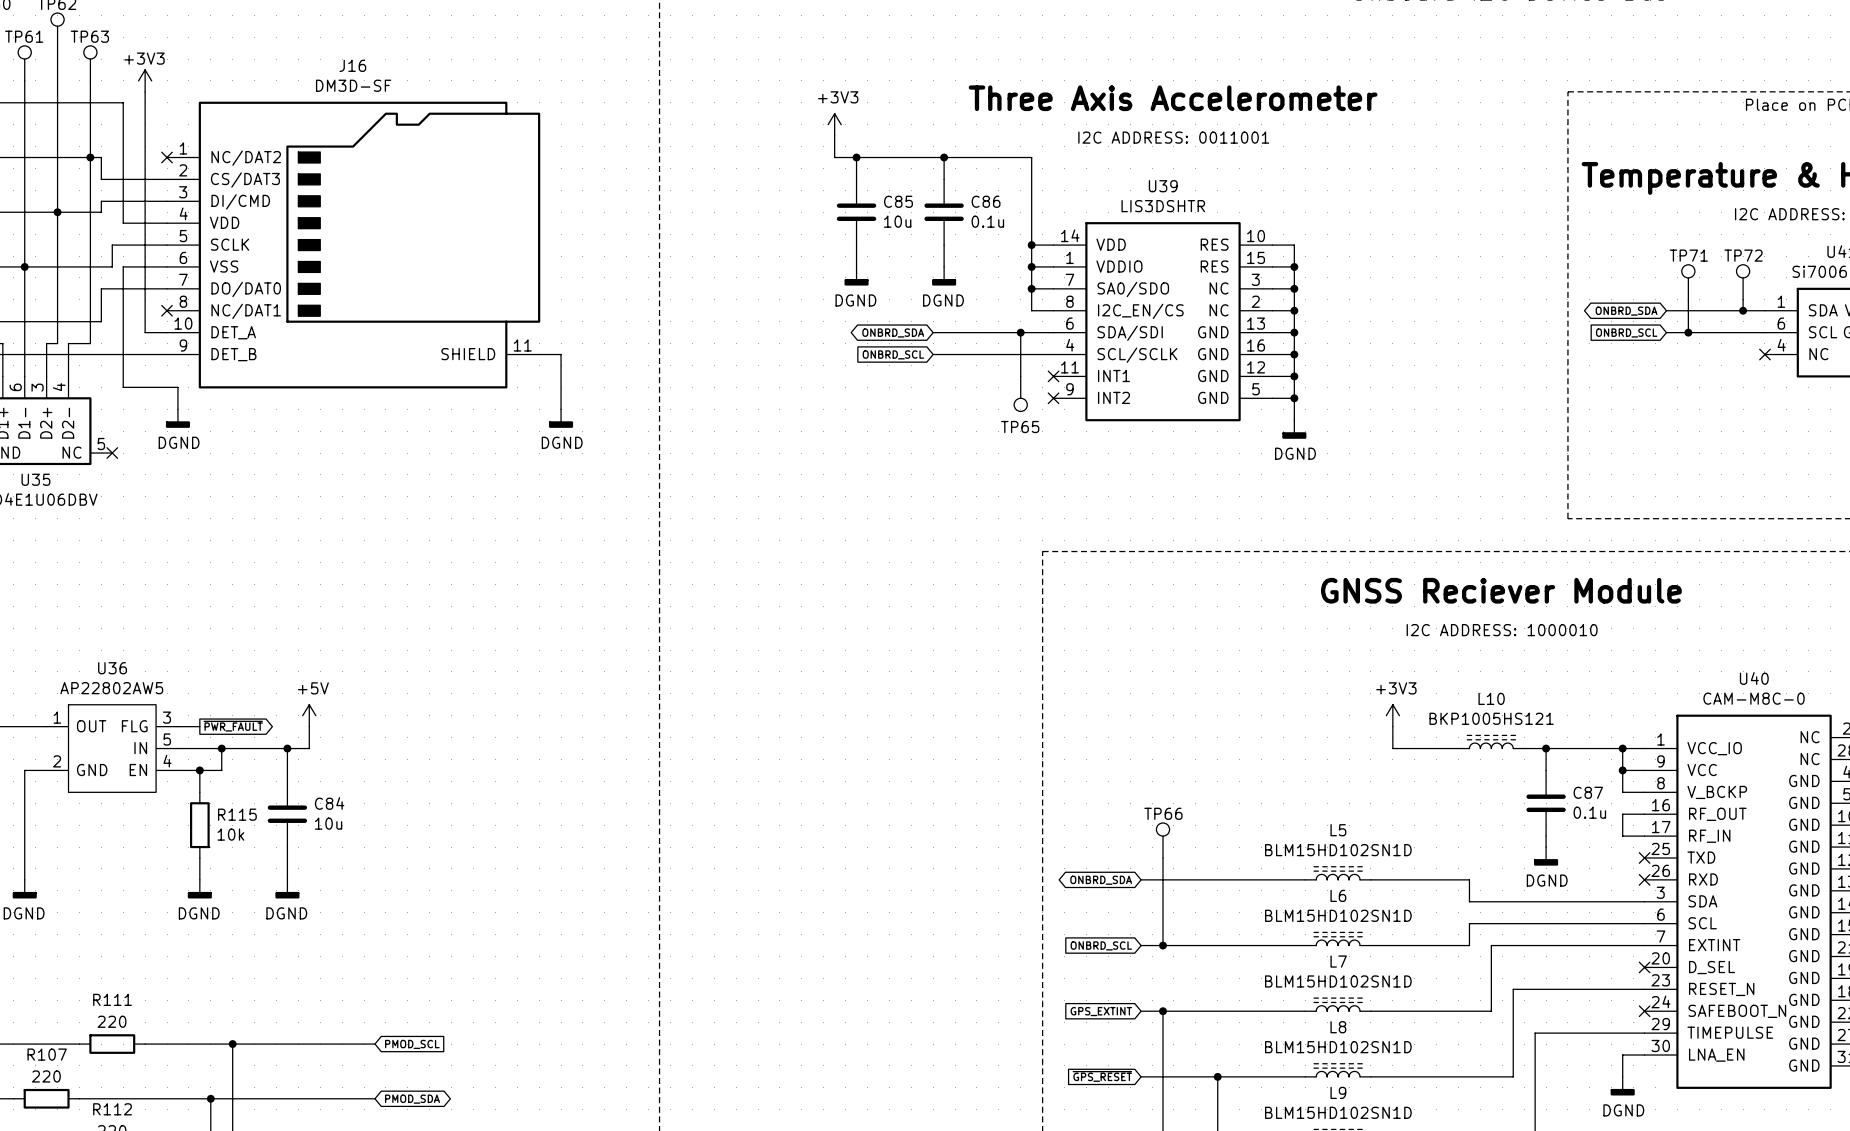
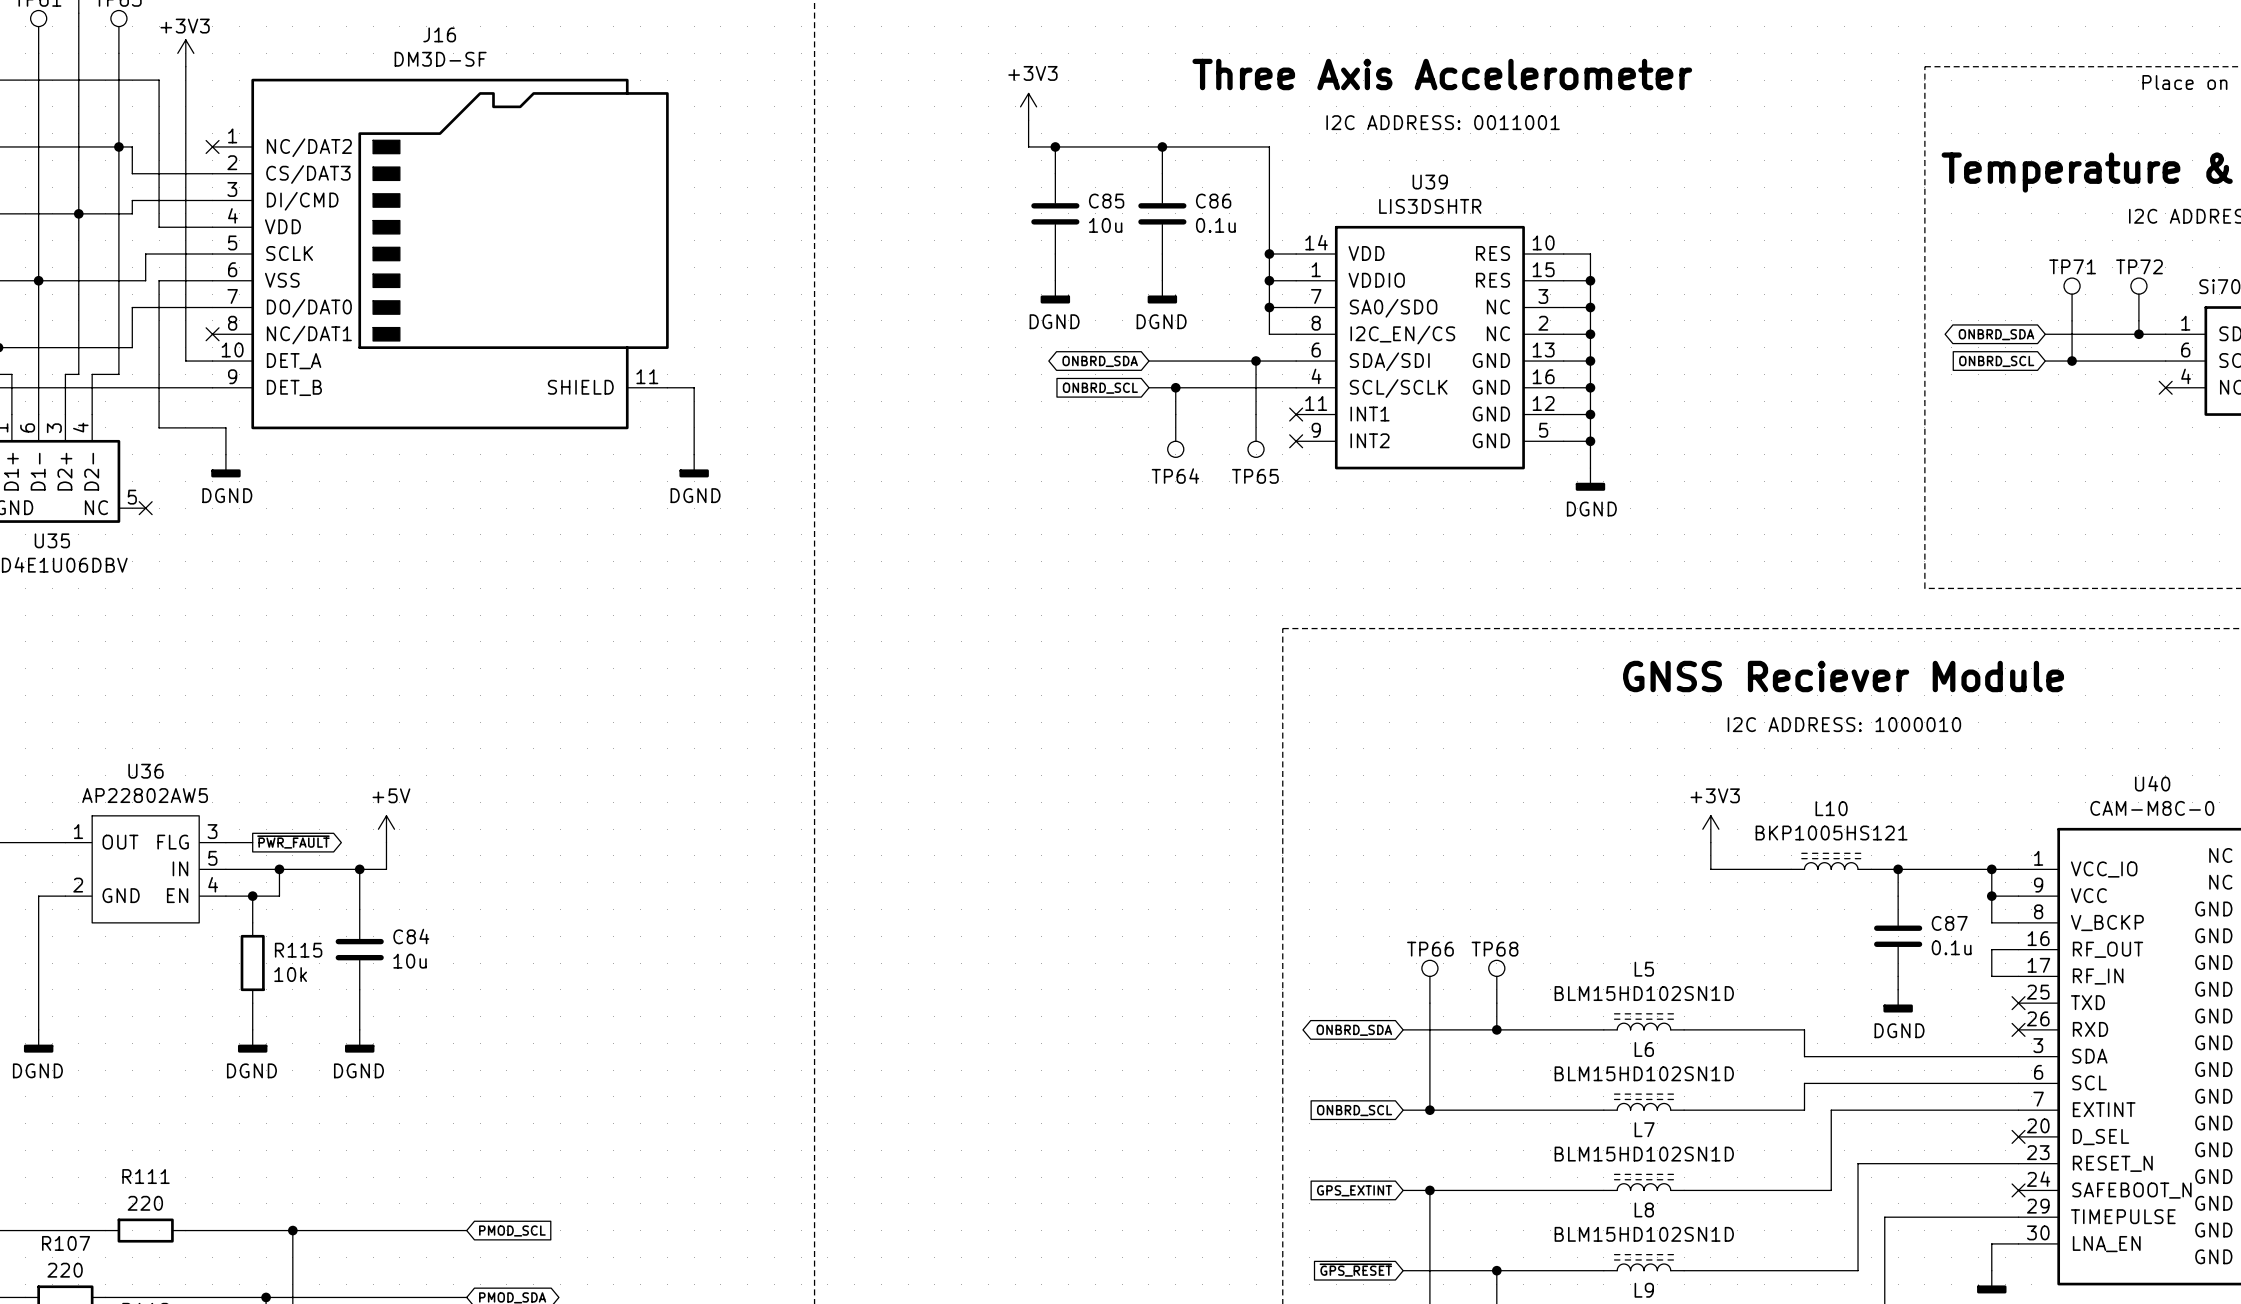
wire: none -> (1175, 387) (1175, 414)
junction: none -> (1175, 387)
TP64: none -> (1175, 435)
TP68: none -> (1496, 981)
wire: none -> (1496, 1003) (1496, 1029)
junction: none -> (1496, 1029)

